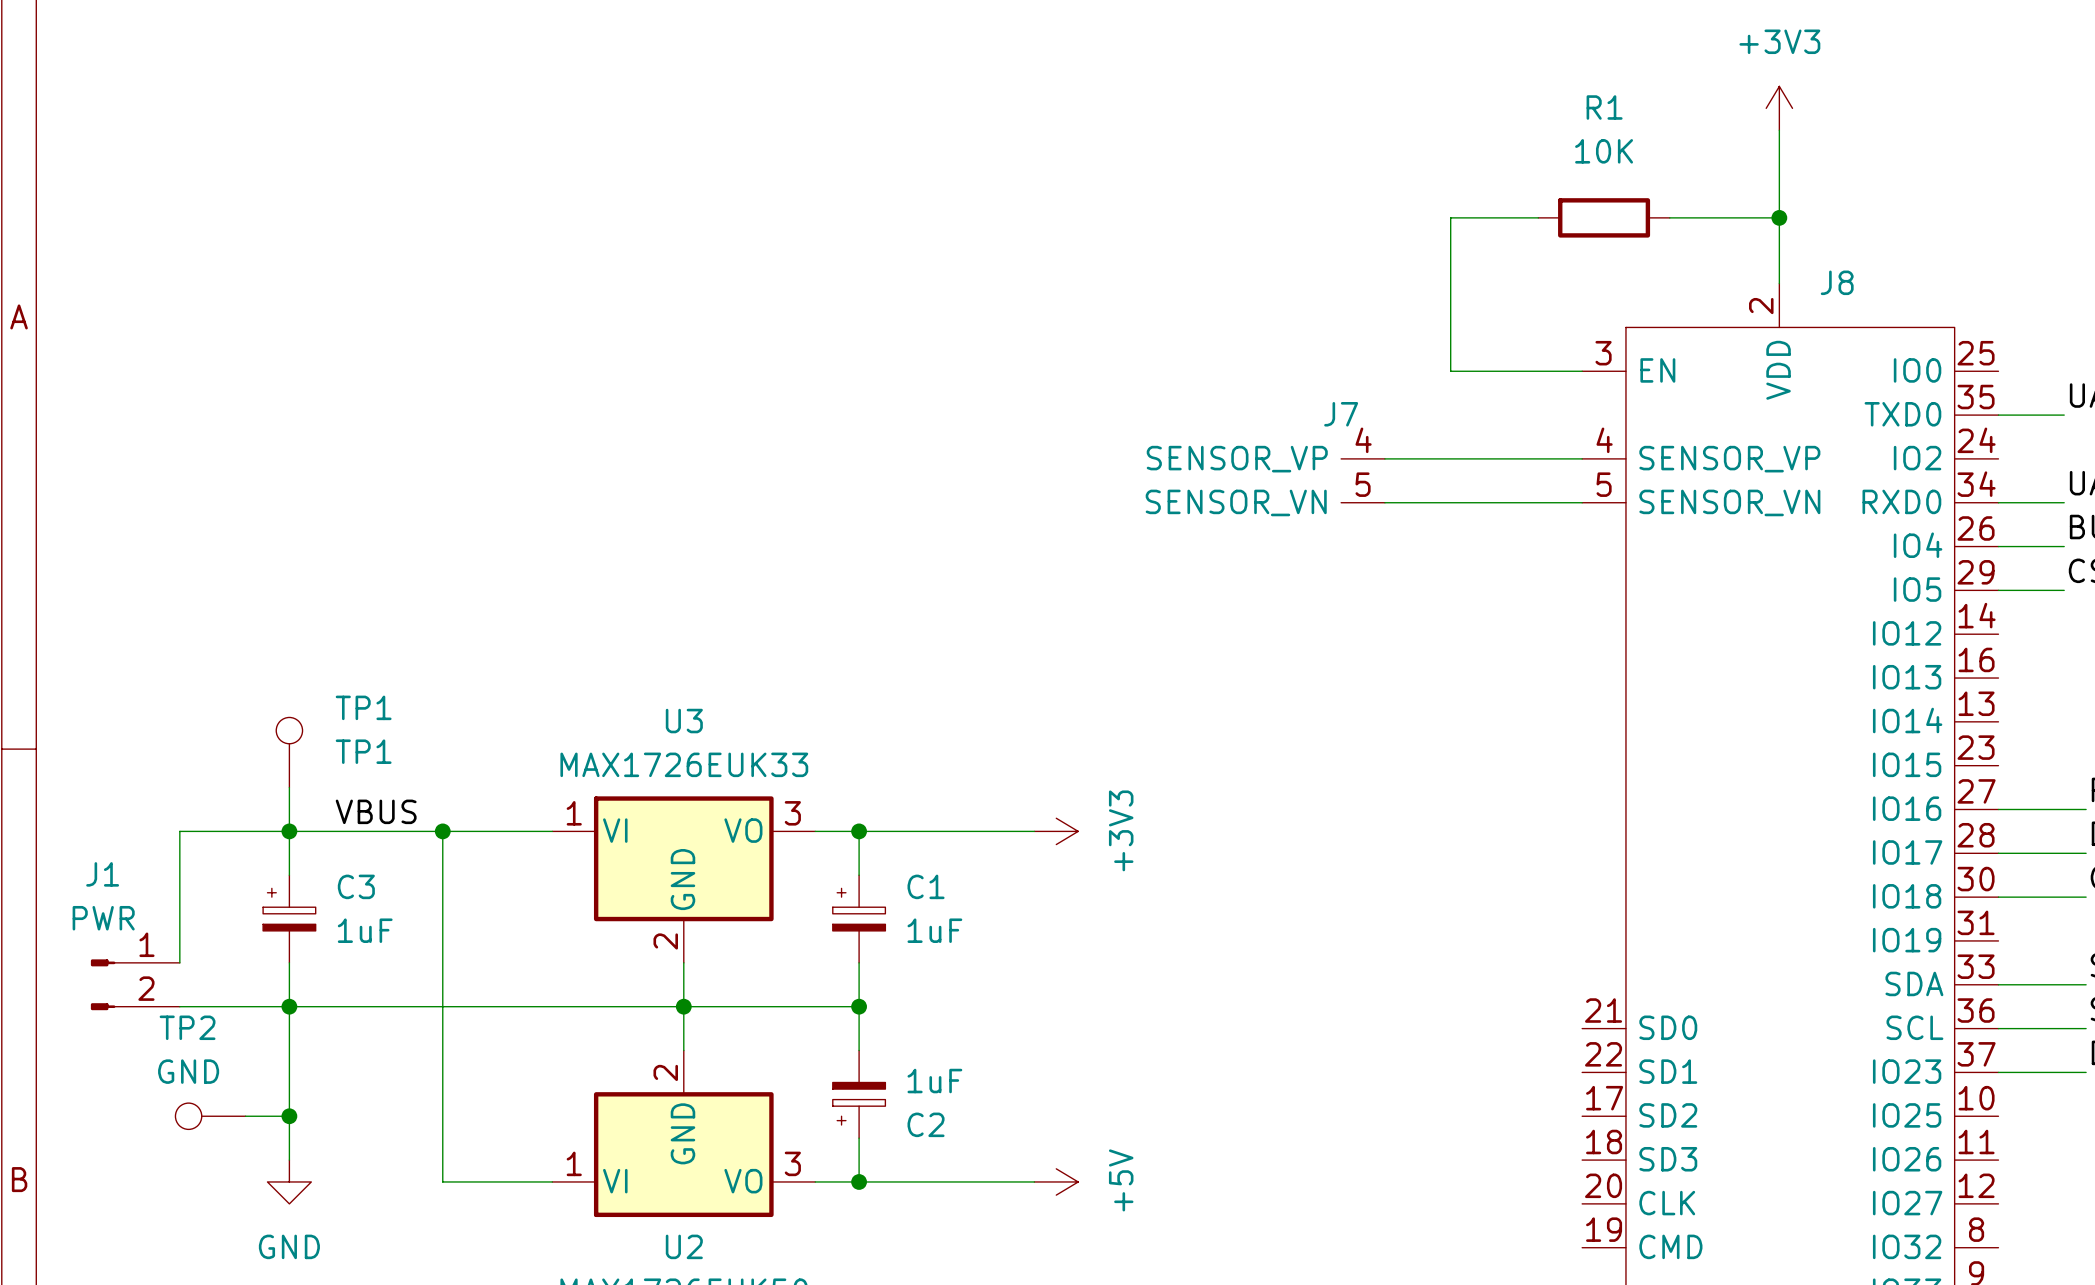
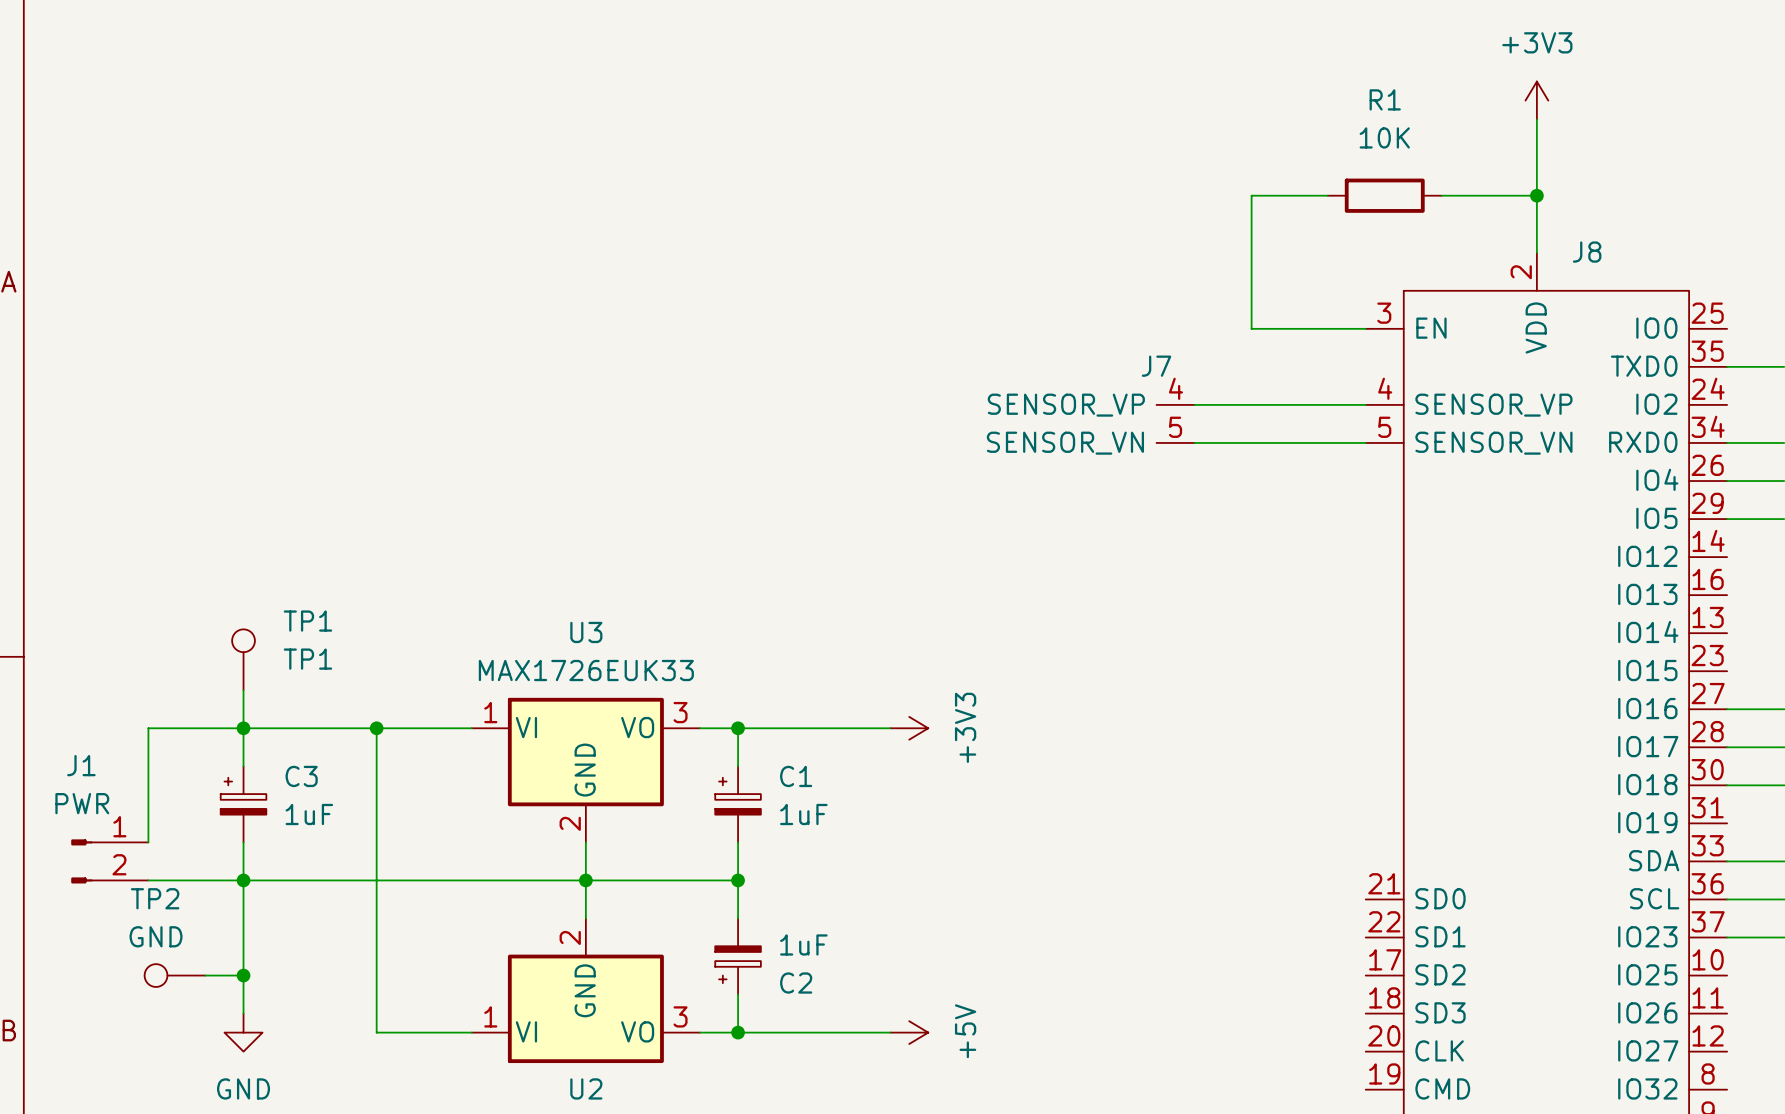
label: VBUS (376, 811) -> none

